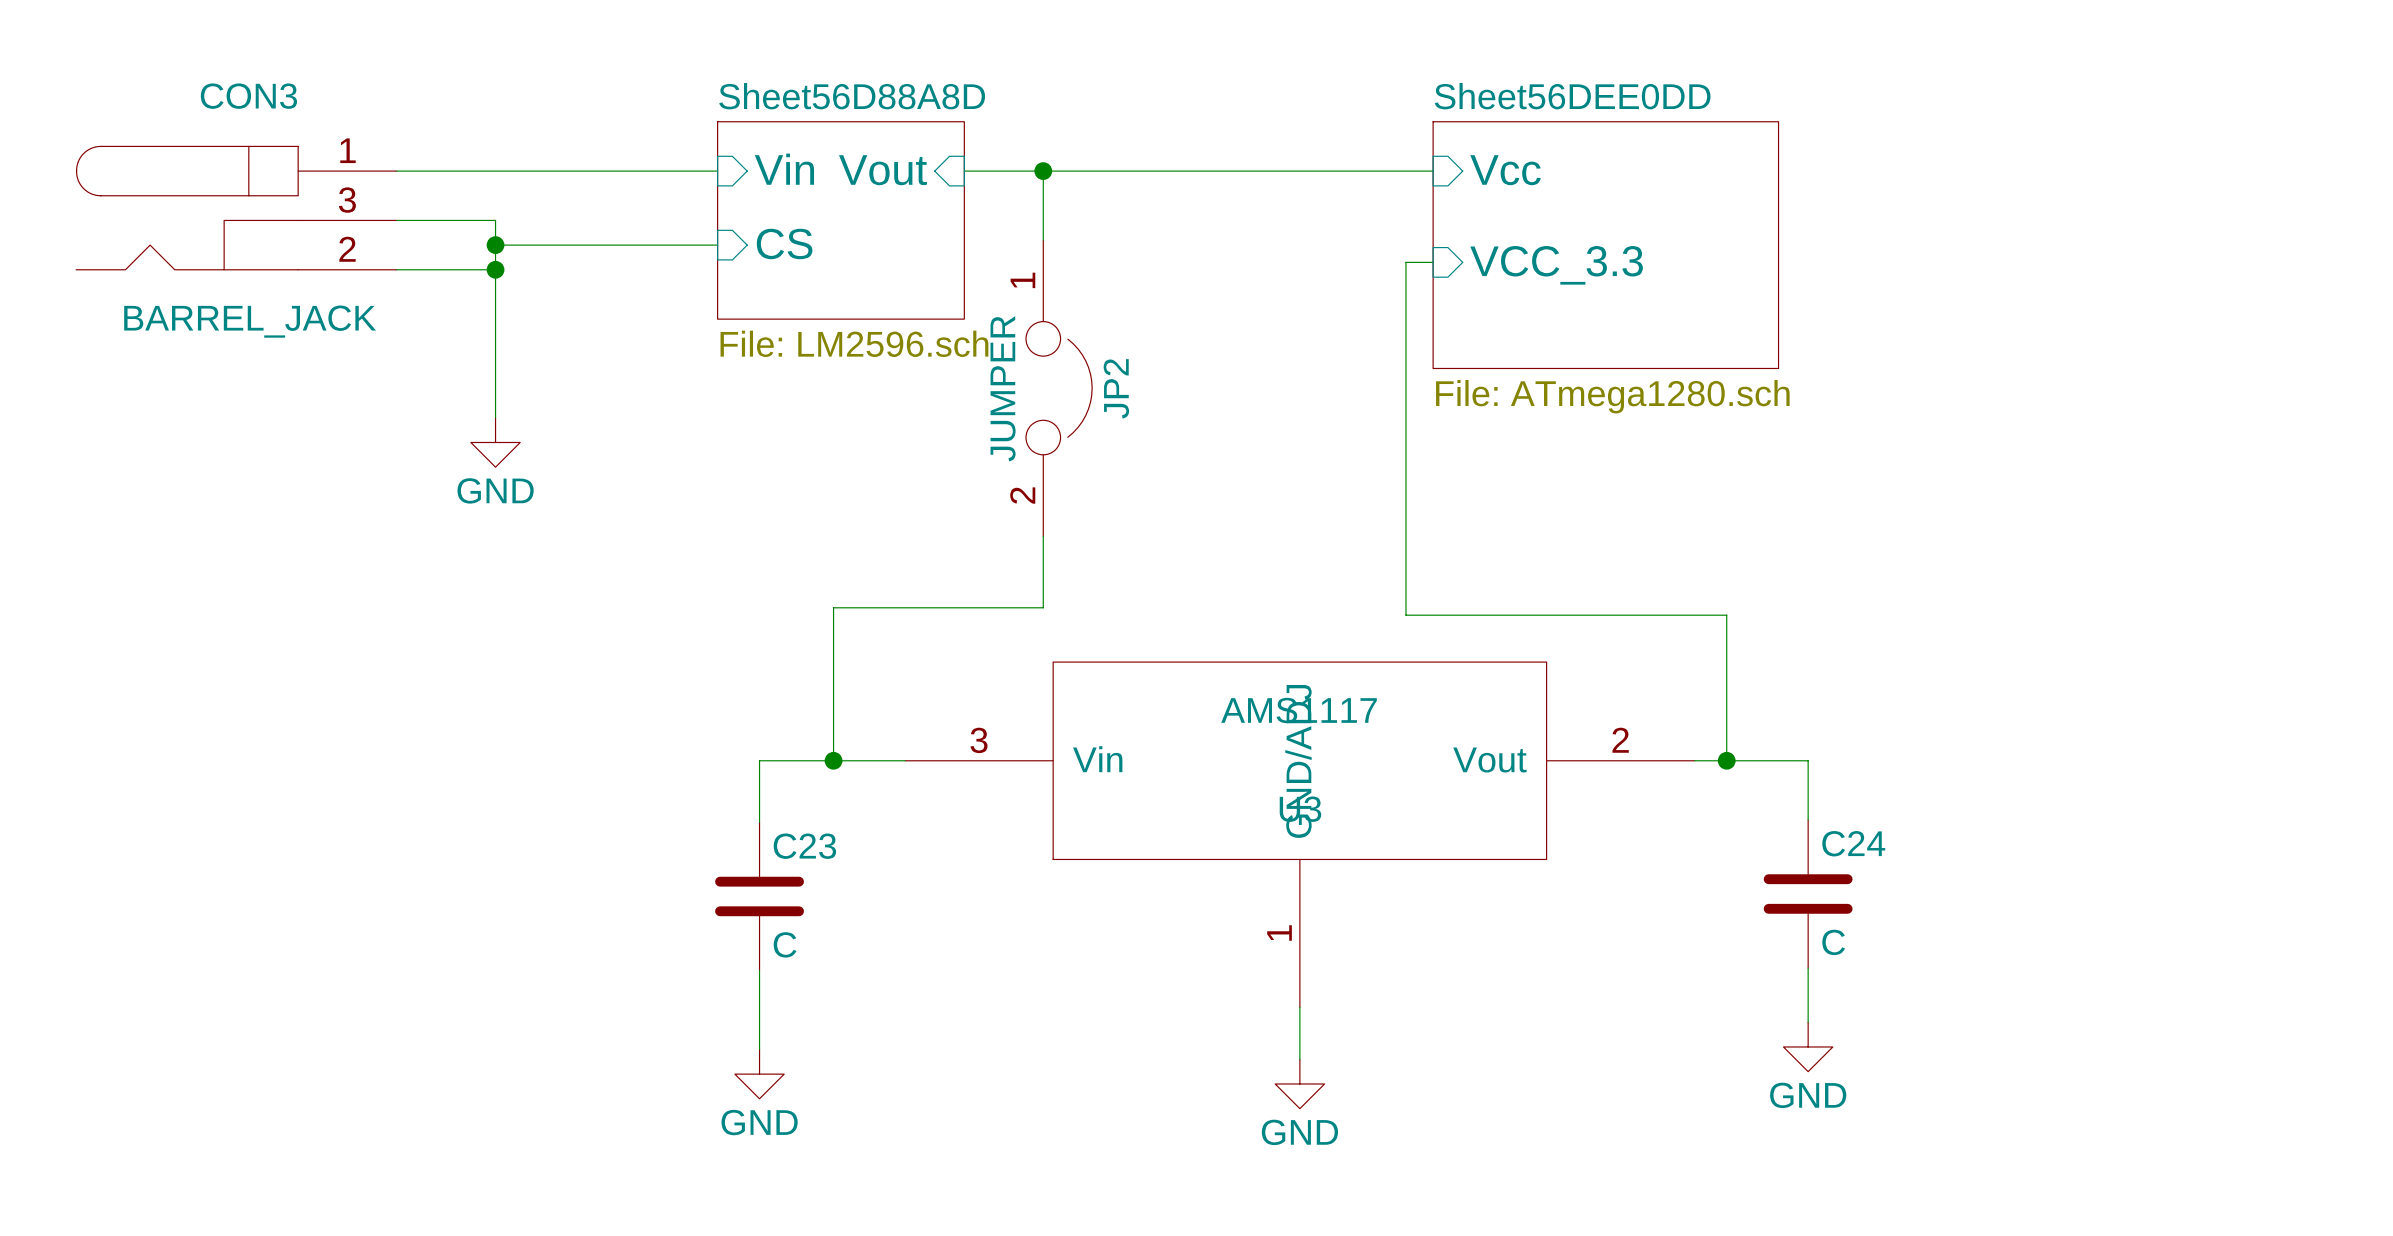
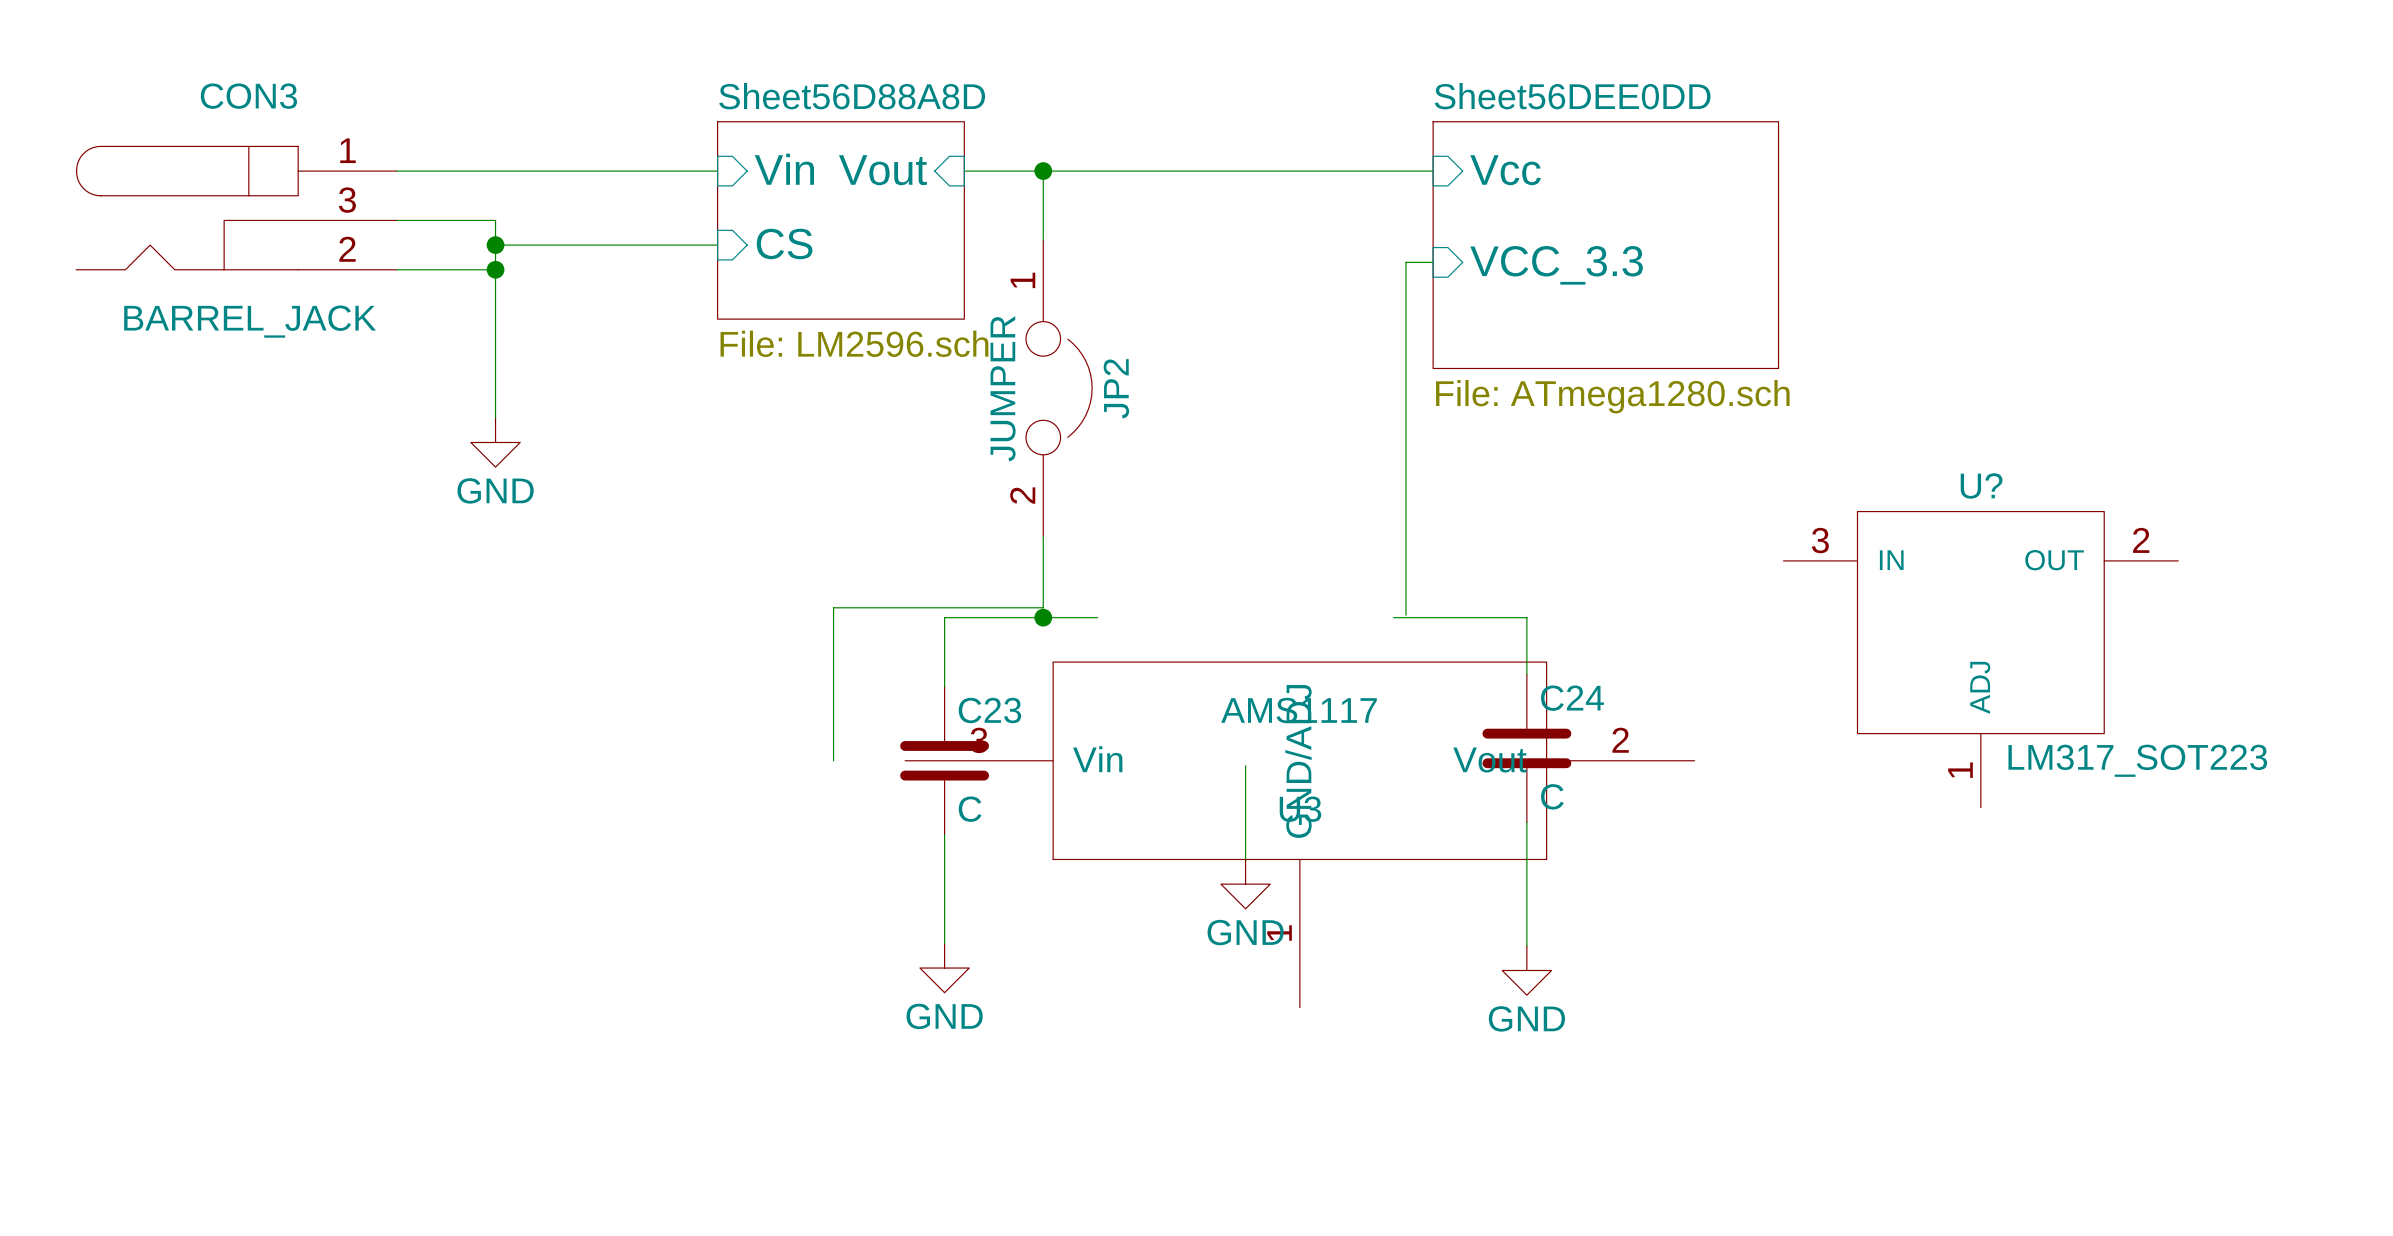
wire: (1405, 615) (1726, 615) (1726, 760) -> none
junction: none -> (1043, 617)
wire: none -> (1097, 617) (944, 617) (944, 686)
wire: none -> (1393, 617) (1526, 617) (1526, 674)
U?: none -> LM317_SOT223 (1980, 659)
junction: (833, 760) -> none
wire: (905, 760) (759, 760) (759, 822) -> none
wire: (1694, 760) (1808, 760) (1808, 819) -> none
junction: (1726, 760) -> none
wire: none -> (1245, 765) (1245, 859)
wire: none -> (1526, 822) (1526, 945)
wire: none -> (944, 834) (944, 943)
power symbol: none -> GND (1245, 884)
C24 position: (1808, 894) -> (1526, 748)
C23 position: (759, 896) -> (944, 760)
power symbol: none -> GND (944, 968)
wire: (1808, 968) (1808, 1022) -> none
wire: (759, 970) (759, 1049) -> none
power symbol: none -> GND (1526, 970)
wire: (1299, 1007) (1299, 1059) -> none
power symbol: GND (1808, 1046) -> none
power symbol: GND (759, 1074) -> none
power symbol: GND (1299, 1083) -> none

